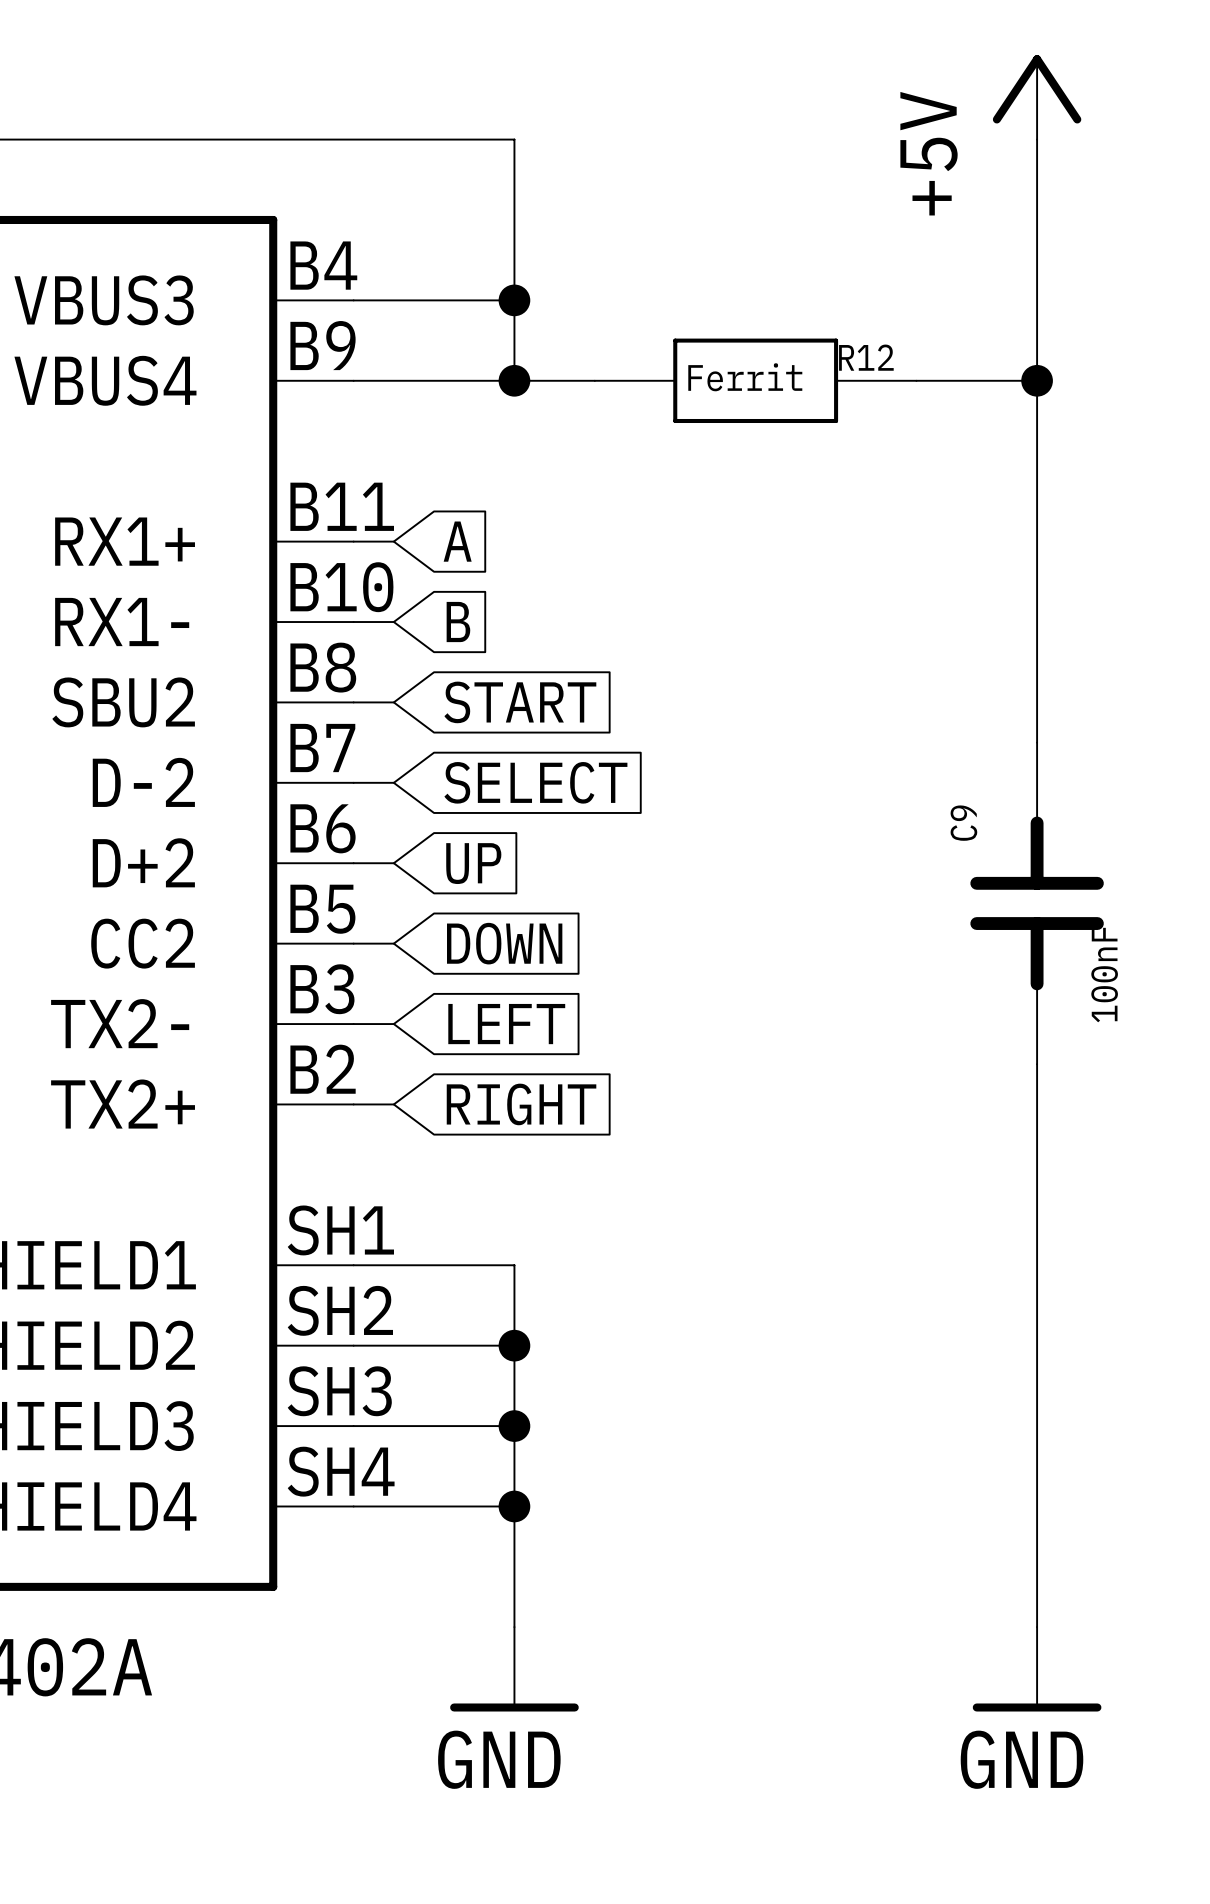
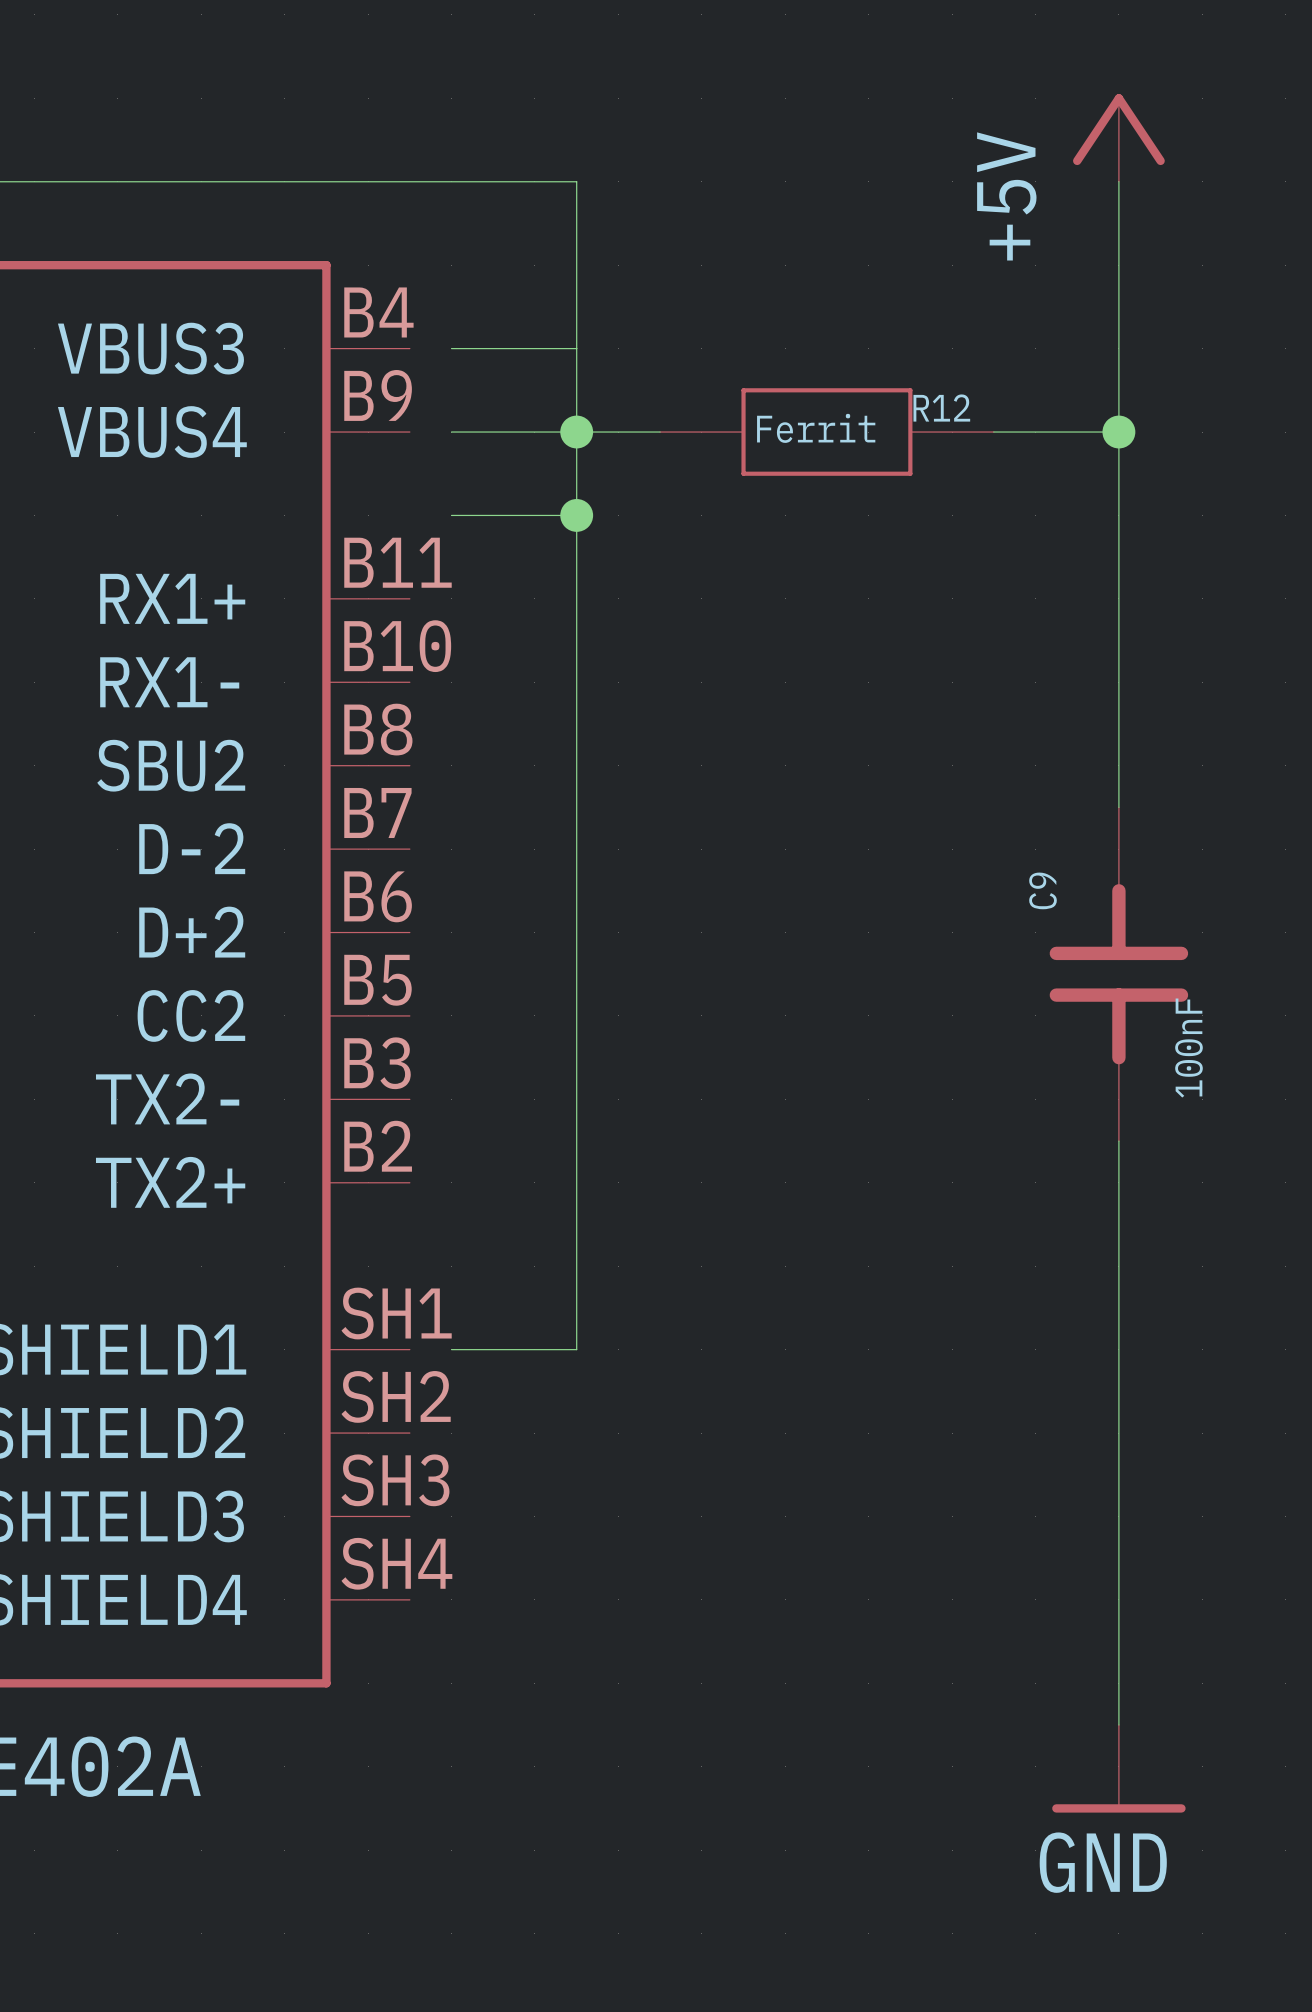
wire: (353, 300) (393, 300) -> none
junction position: (514, 300) -> (576, 515)
wire: (353, 380) (393, 380) -> none
wire: none -> (451, 515) (576, 515)
wire: (353, 541) (393, 541) -> none
global label: A (457, 541) -> none
wire: (353, 622) (393, 622) -> none
global label: B (458, 622) -> none
wire: (353, 702) (393, 702) -> none
global label: START (520, 702) -> none
wire: (353, 782) (393, 782) -> none
global label: SELECT (535, 782) -> none
wire: (353, 863) (393, 863) -> none
global label: UP (473, 863) -> none
wire: (353, 943) (393, 943) -> none
global label: DOWN (504, 943) -> none
wire: (353, 1024) (393, 1024) -> none
global label: LEFT (506, 1024) -> none
wire: (353, 1104) (393, 1104) -> none
global label: RIGHT (521, 1104) -> none
wire: (353, 1265) (393, 1265) -> none
wire: (514, 1265) (514, 1627) -> (576, 1349) (576, 432)
wire: (353, 1345) (514, 1345) -> none
junction: (514, 1345) -> none
wire: (353, 1426) (514, 1426) -> none
junction: (514, 1426) -> none
wire: (353, 1506) (514, 1506) -> none
junction: (514, 1506) -> none
power symbol: GND (514, 1669) -> none

